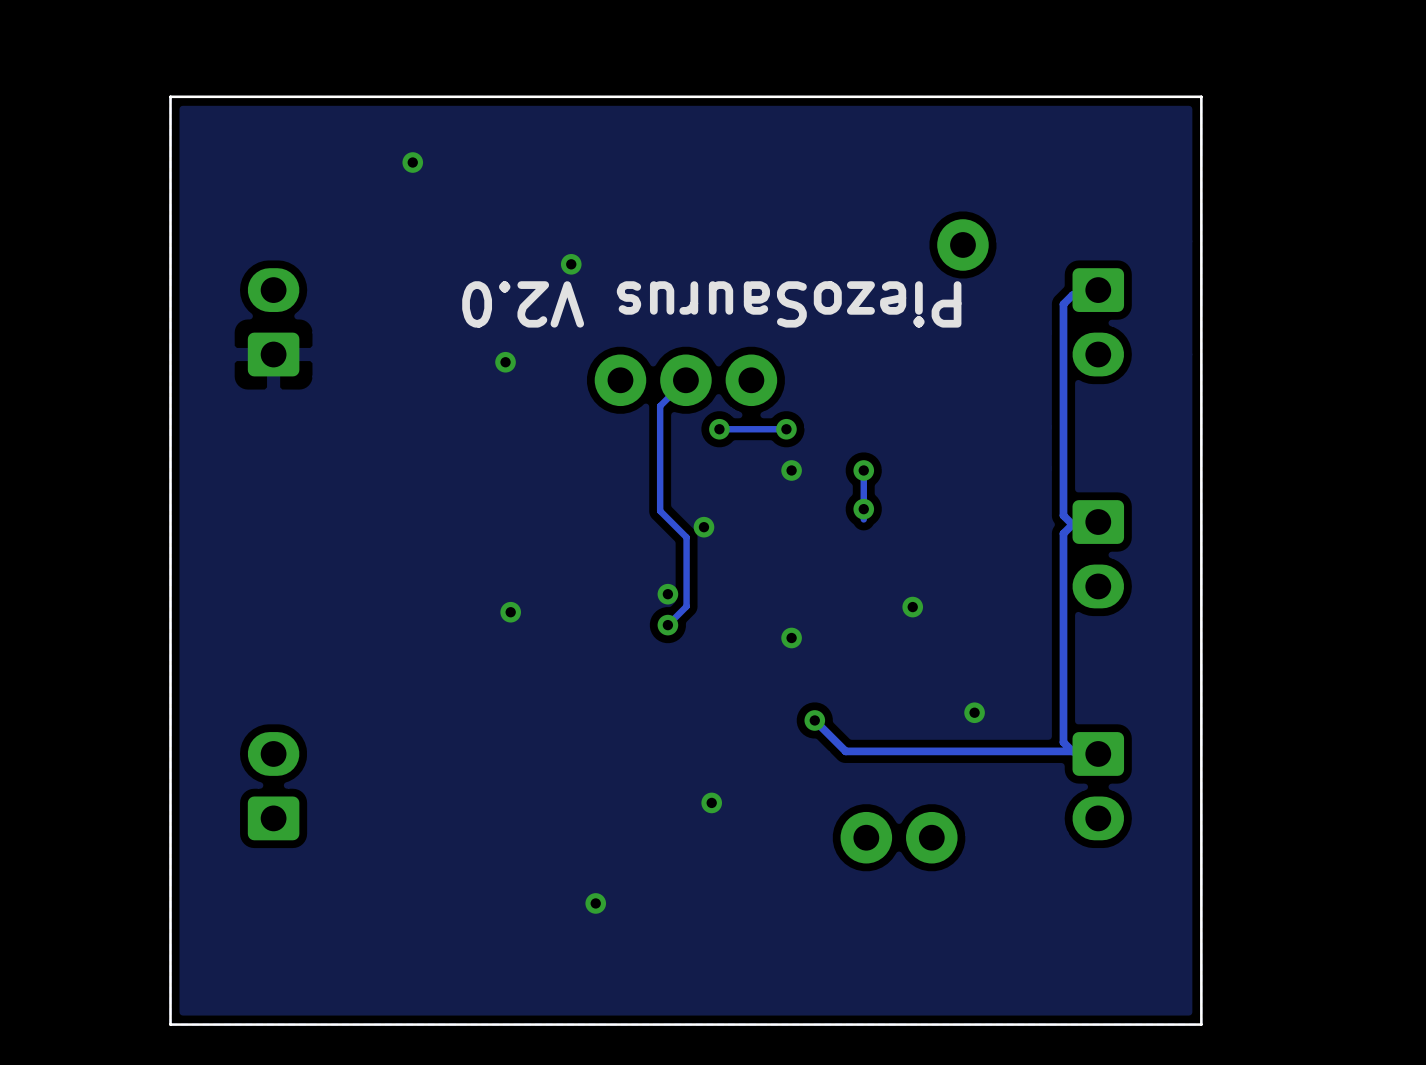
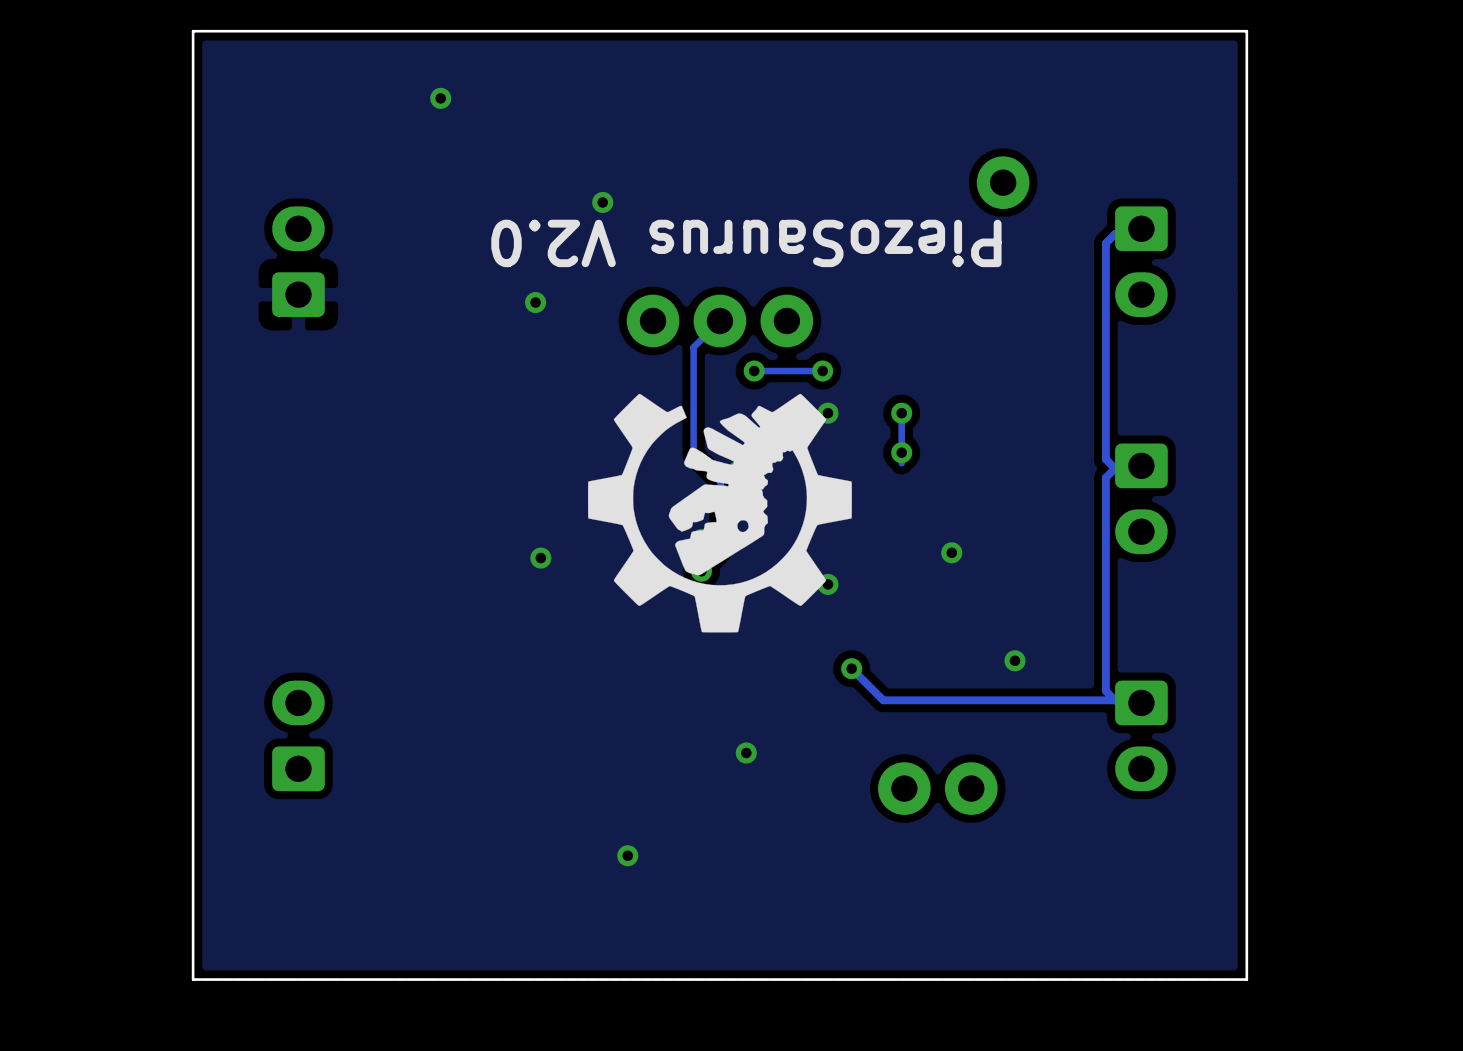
drawing: none -> [587, 393, 852, 633]

